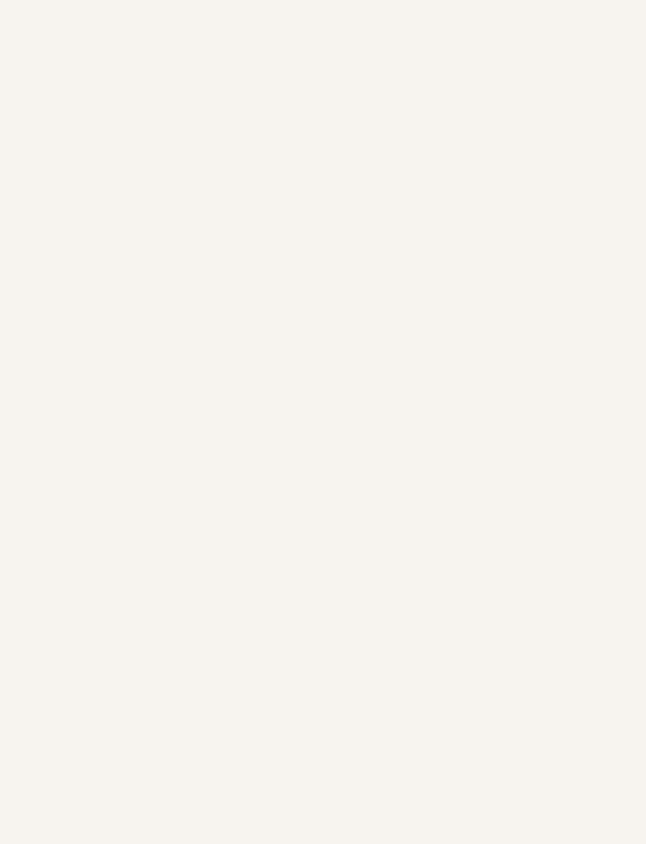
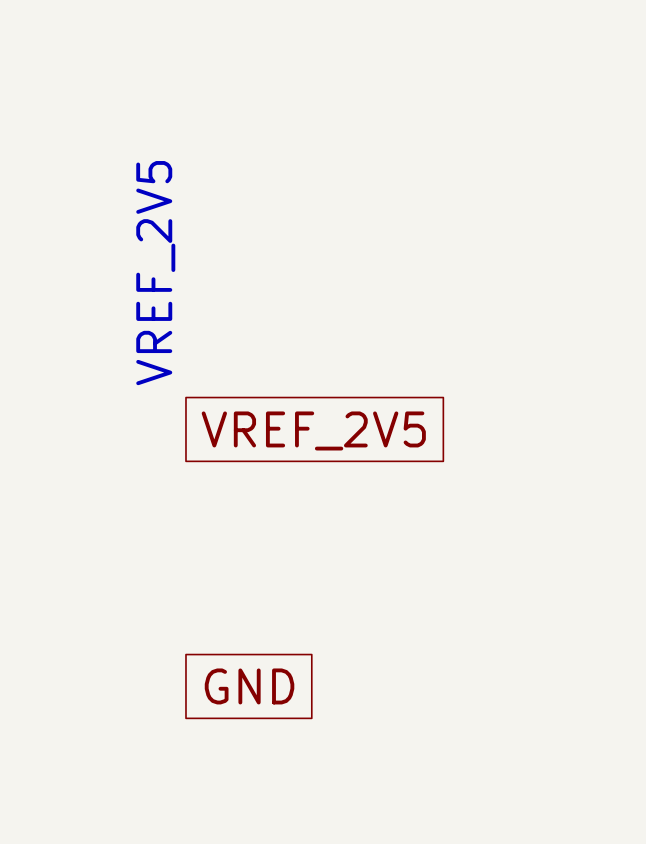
text: none -> VREF_2V5 (155, 273)
global label: none -> VREF_2V5 (313, 430)
global label: none -> GND (249, 686)

